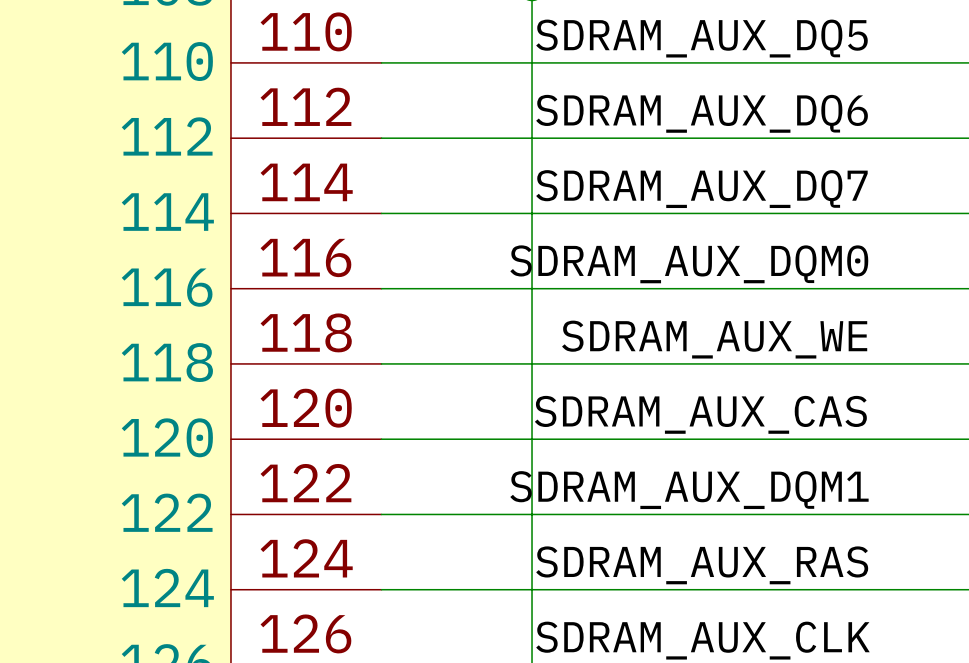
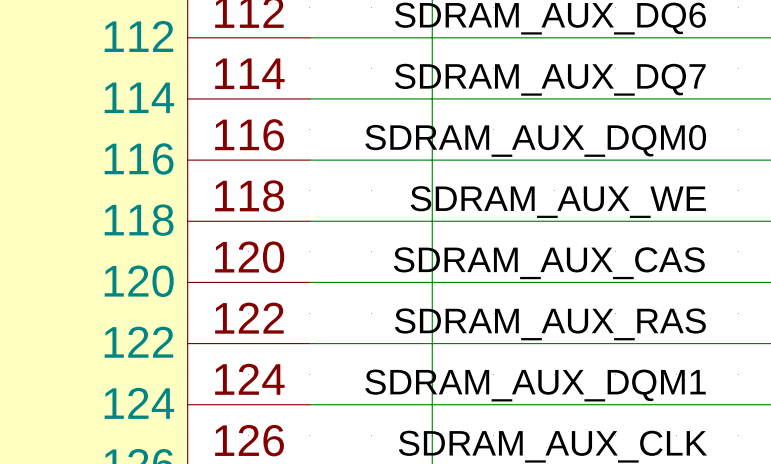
label: SDRAM_AUX_DQM1 (689, 490) -> SDRAM_AUX_RAS (550, 324)
label: SDRAM_AUX_RAS (702, 565) -> SDRAM_AUX_DQM1 (535, 385)

